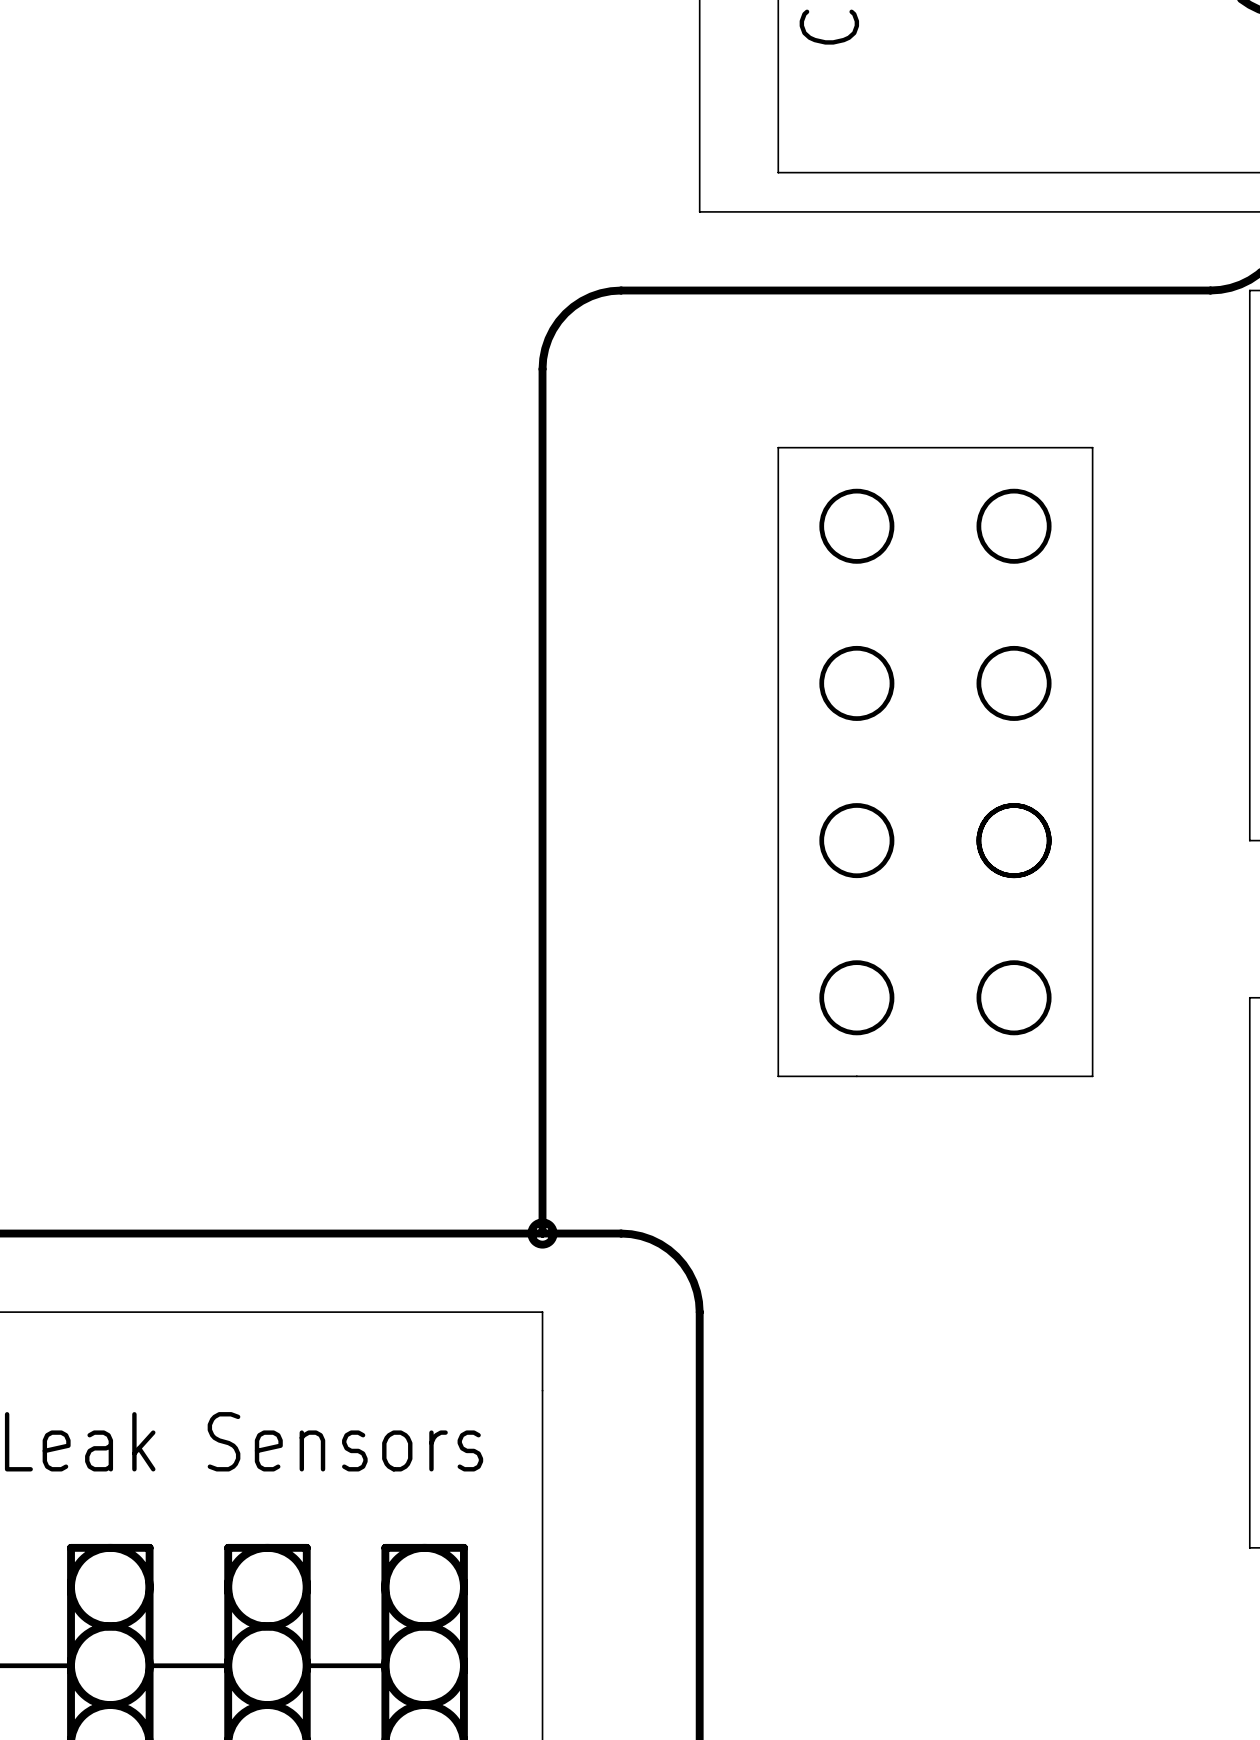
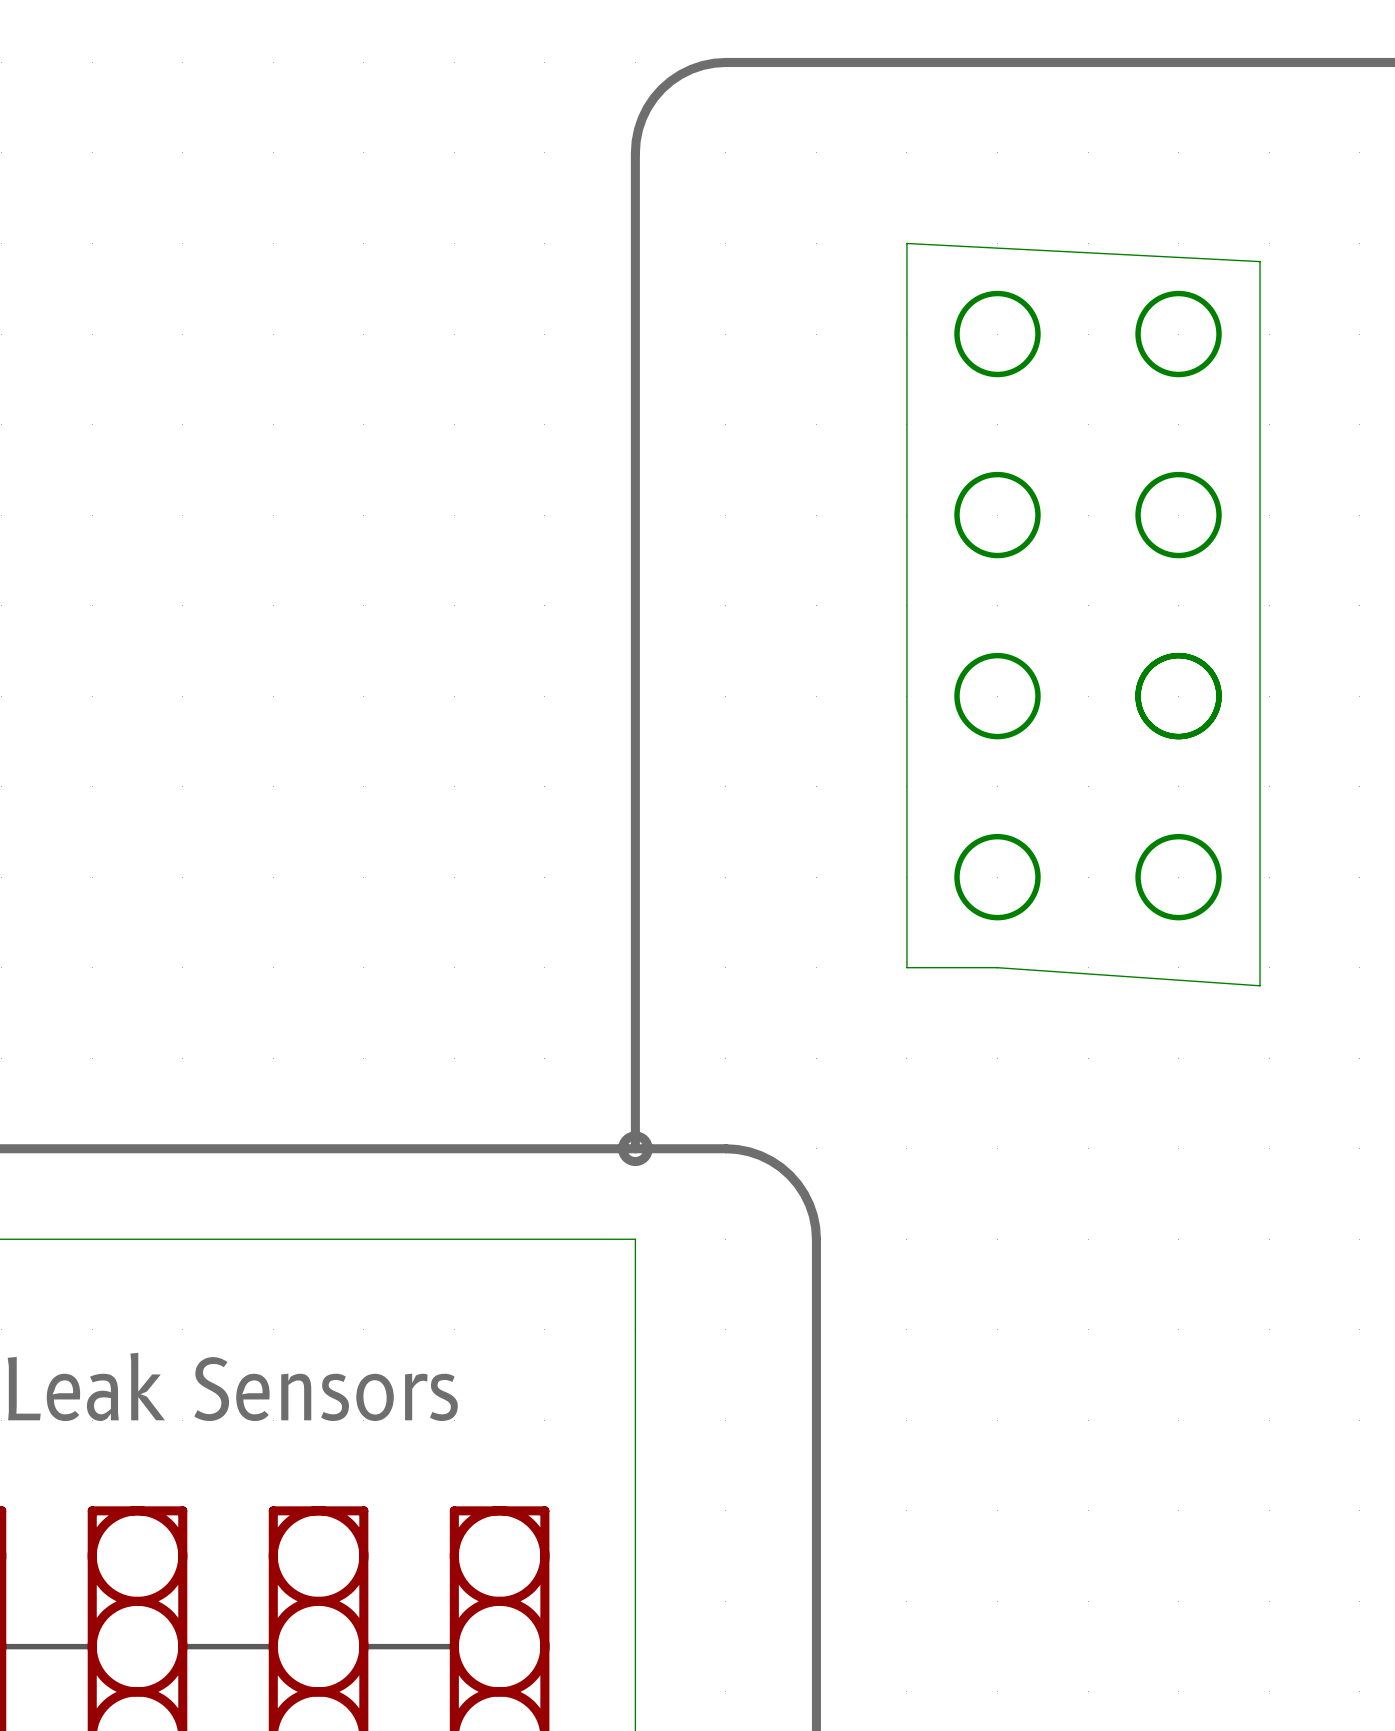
wire: (778, 447) (1092, 447) (1092, 1076) (856, 1076) -> (906, 243) (1260, 261) (1260, 985) (997, 967)

